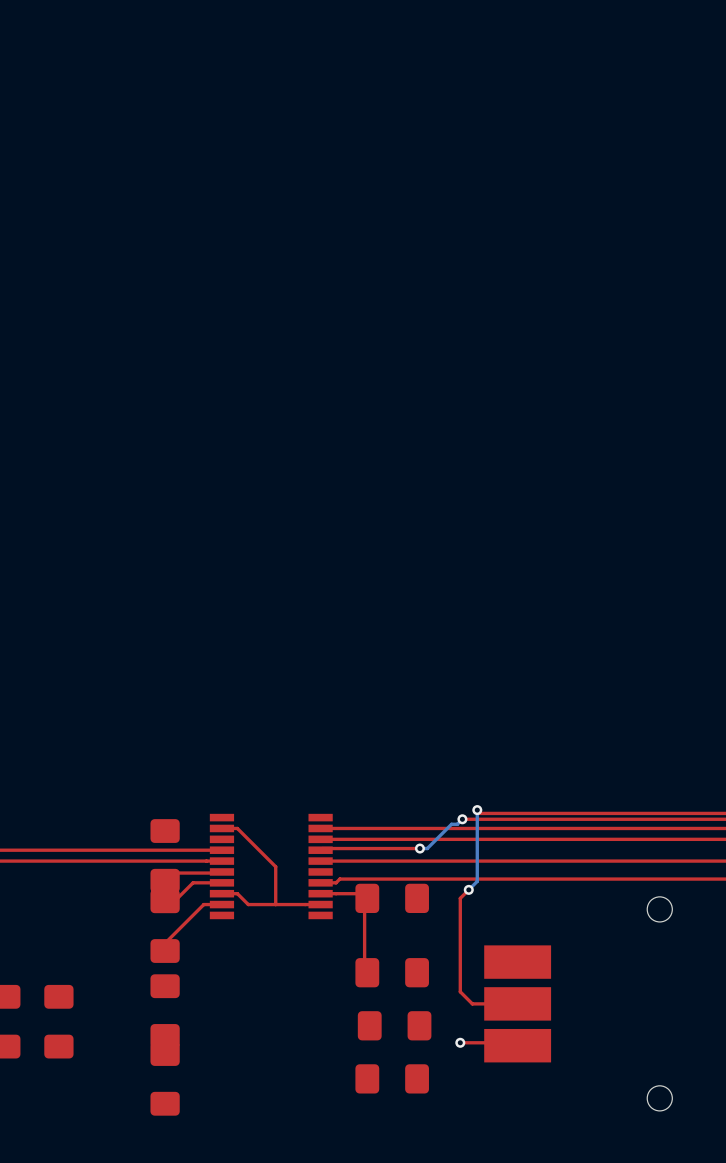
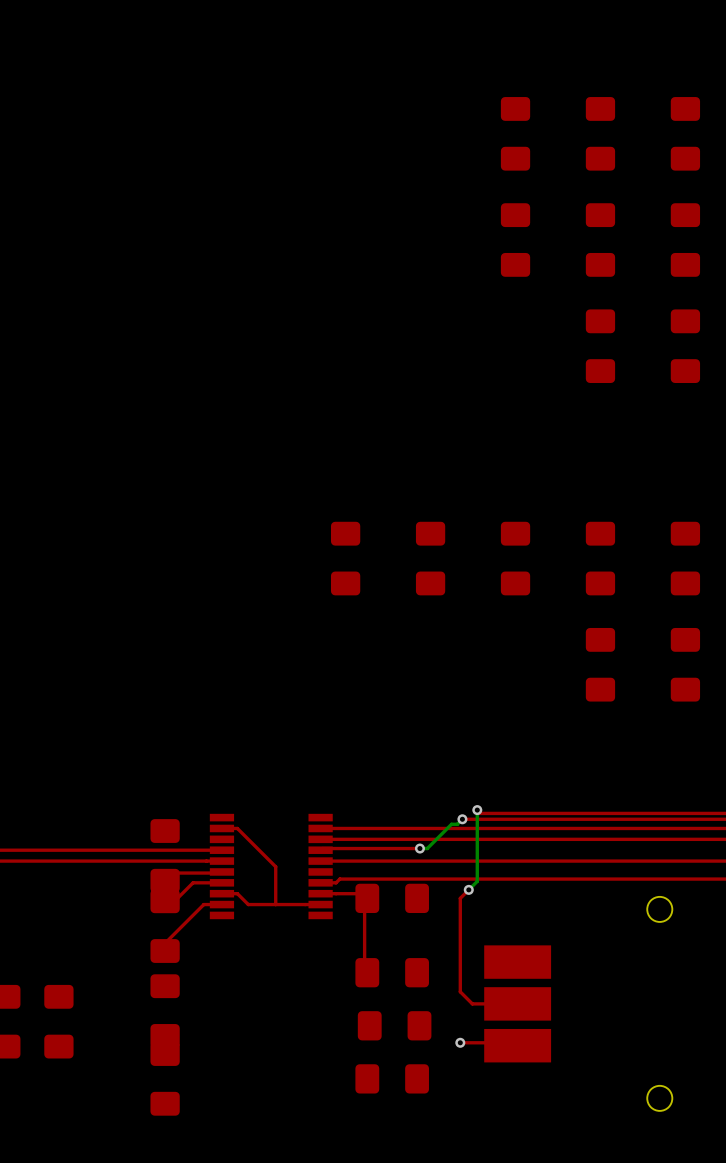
part: none -> (515, 133)
part: none -> (600, 133)
part: none -> (685, 133)
part: none -> (515, 240)
part: none -> (600, 240)
part: none -> (685, 240)
part: none -> (600, 346)
part: none -> (685, 346)
part: none -> (345, 558)
part: none -> (430, 558)
part: none -> (515, 558)
part: none -> (600, 558)
part: none -> (685, 558)
part: none -> (600, 664)
part: none -> (685, 664)

